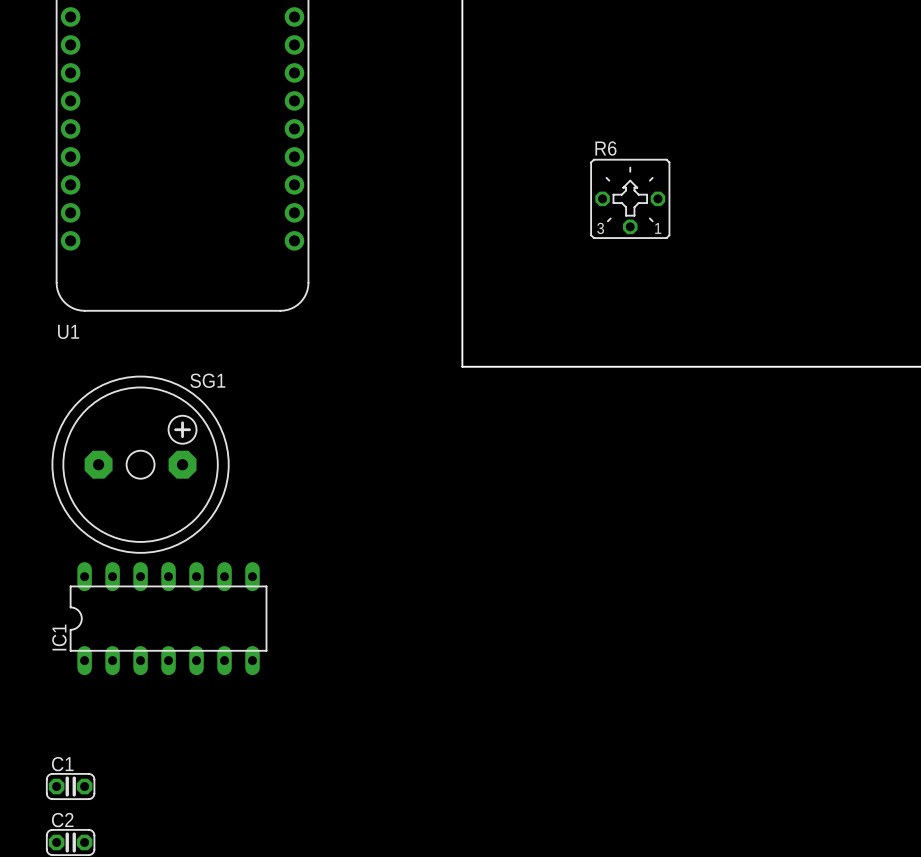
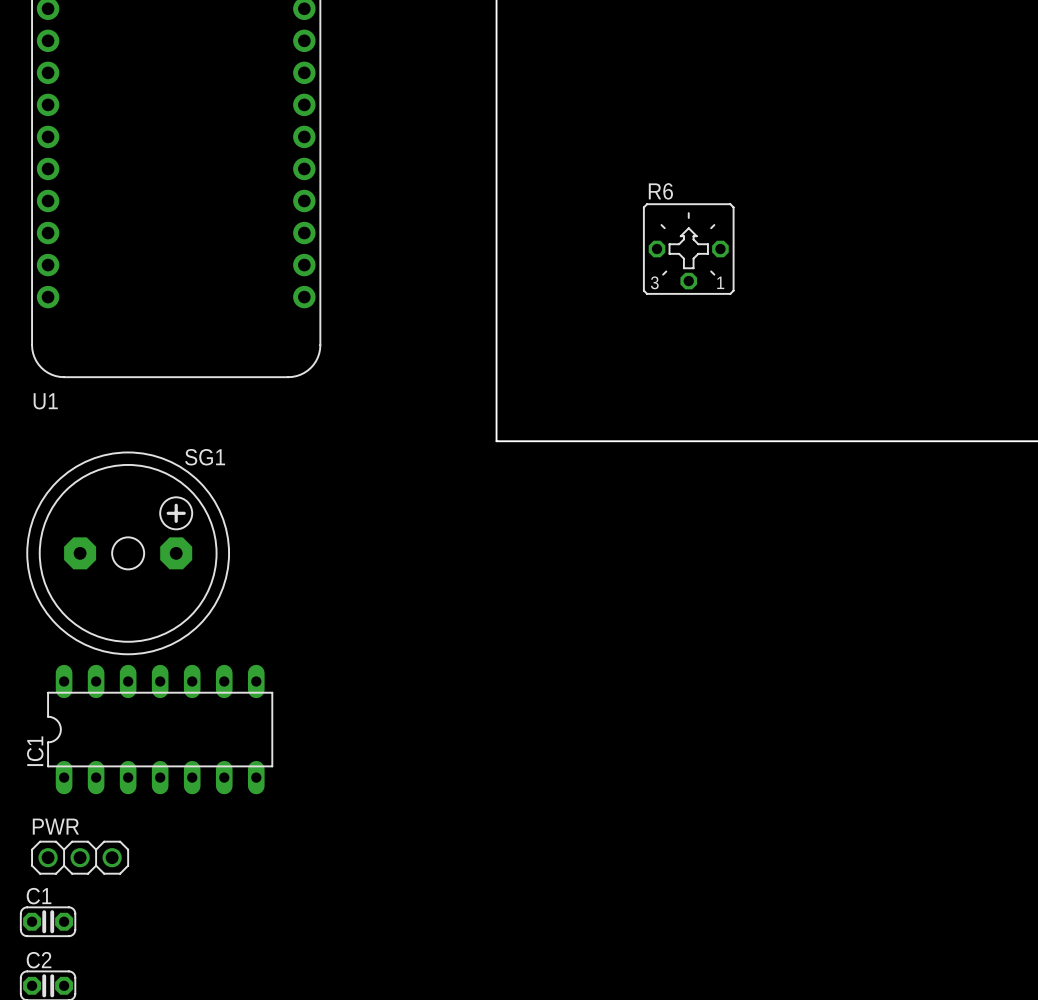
PWR: none -> (80, 857)

